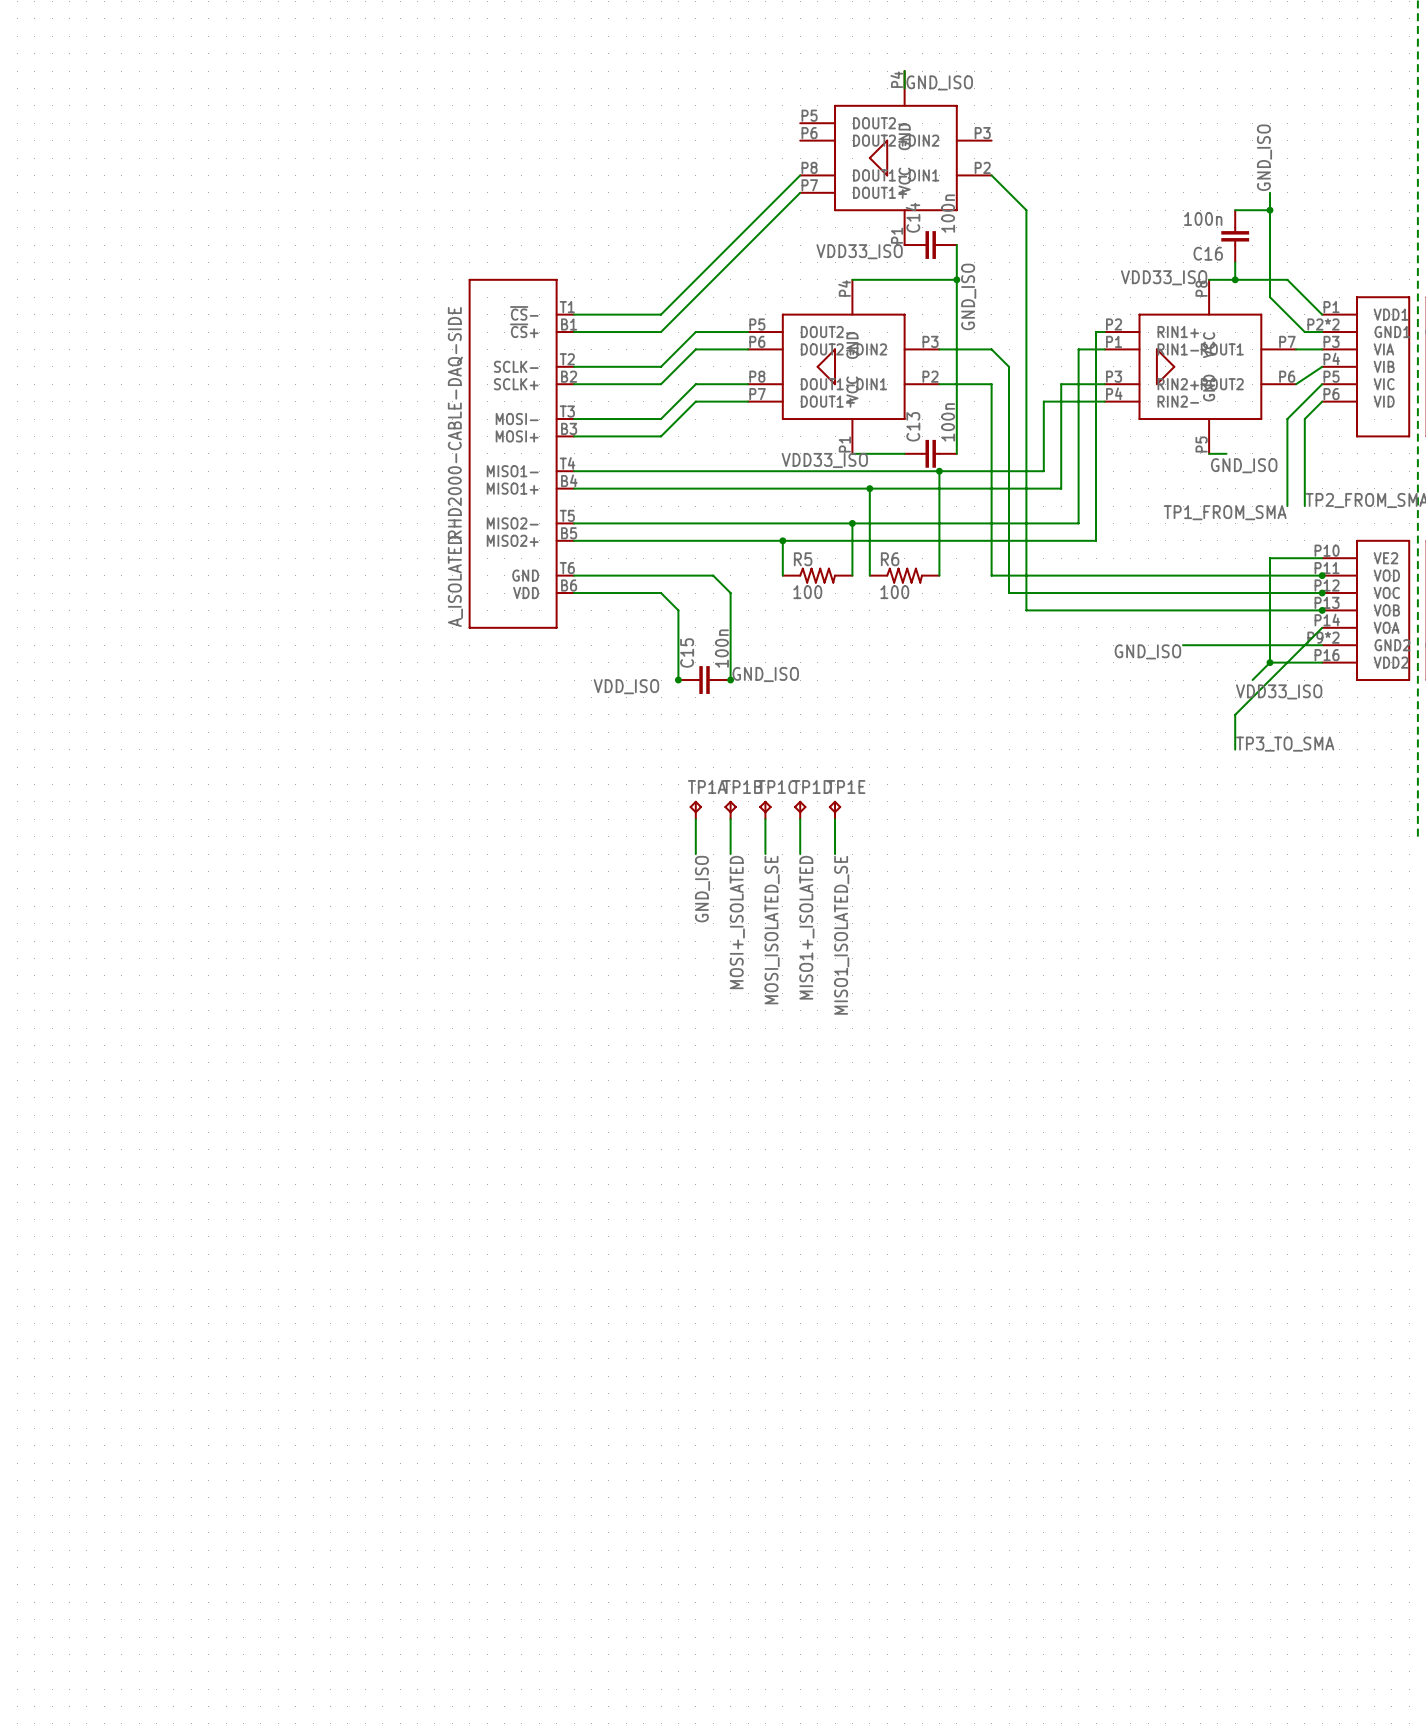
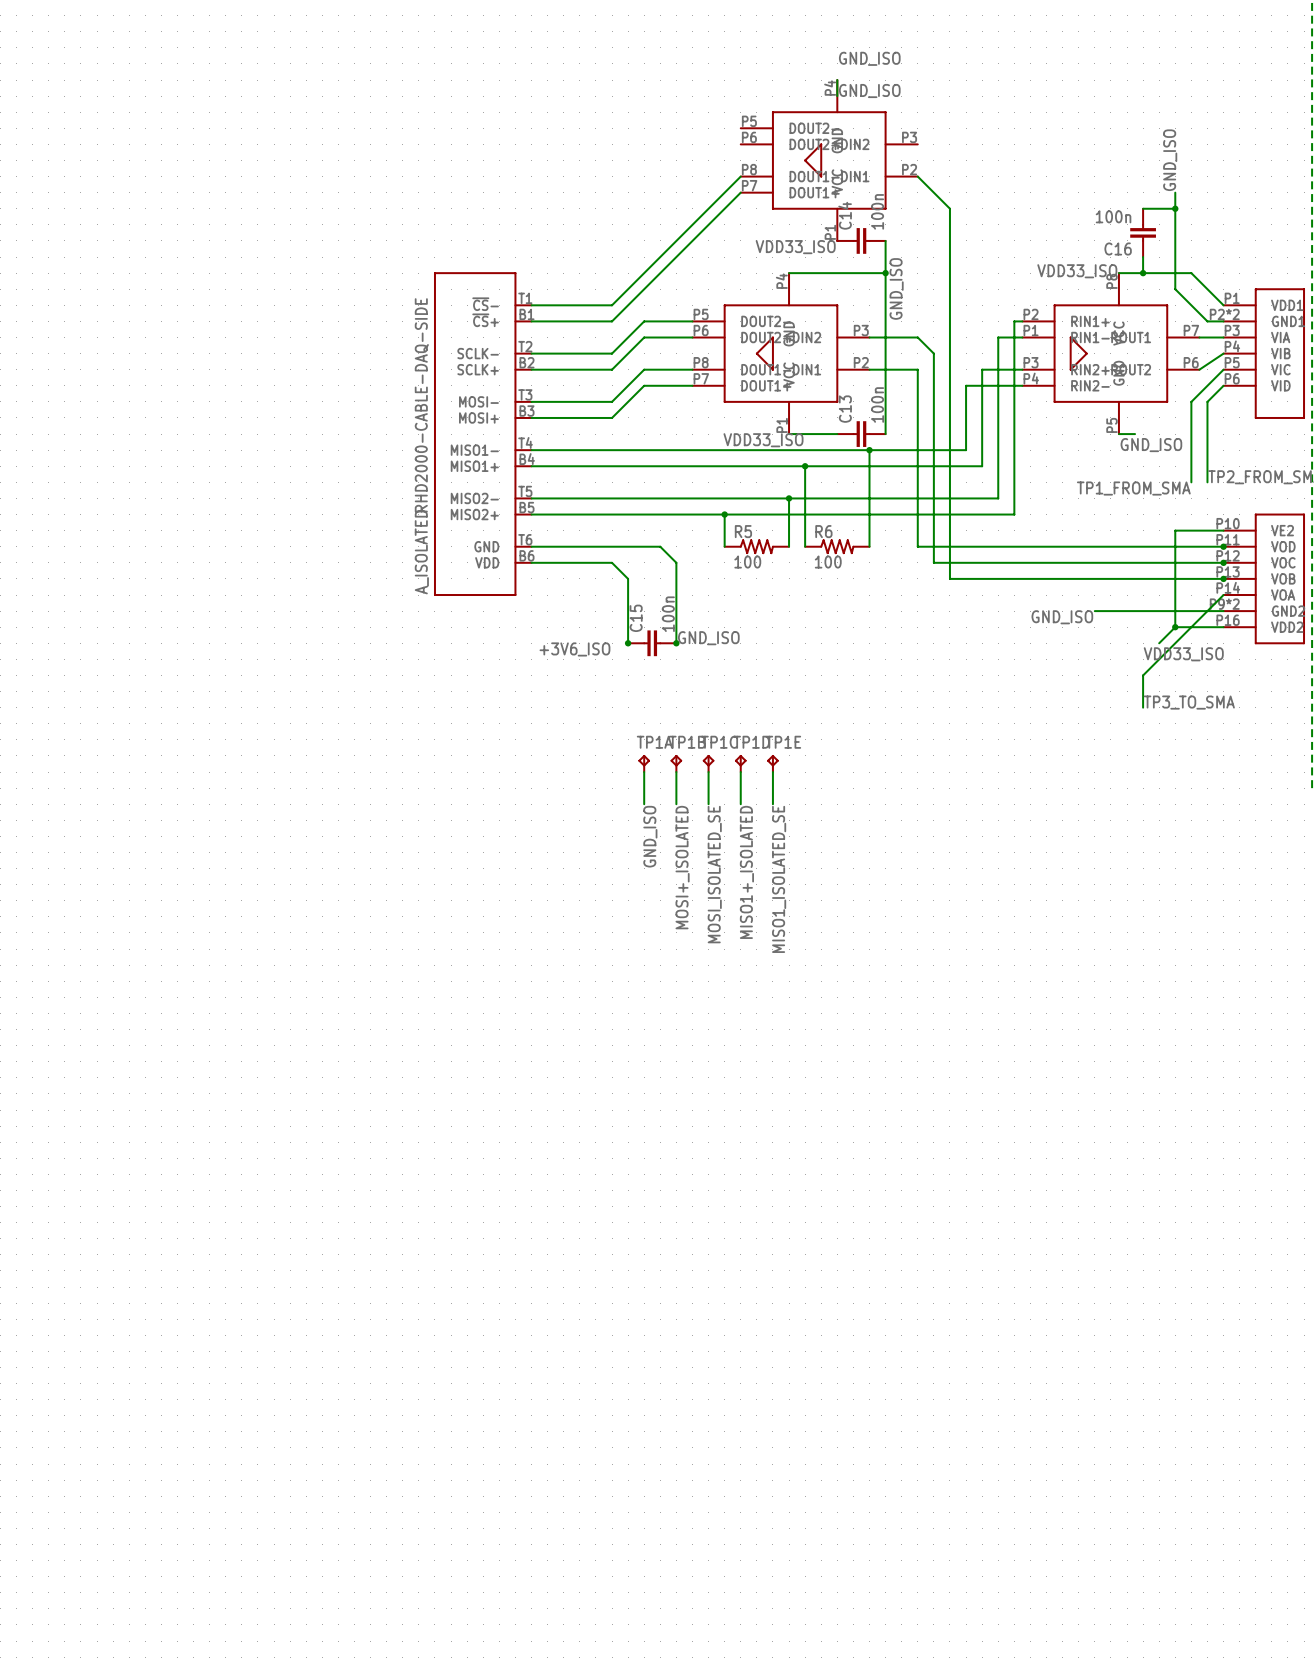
label: none -> GND_ISO (869, 58)
label: VDD_ISO (626, 686) -> +3V6_ISO (574, 649)

